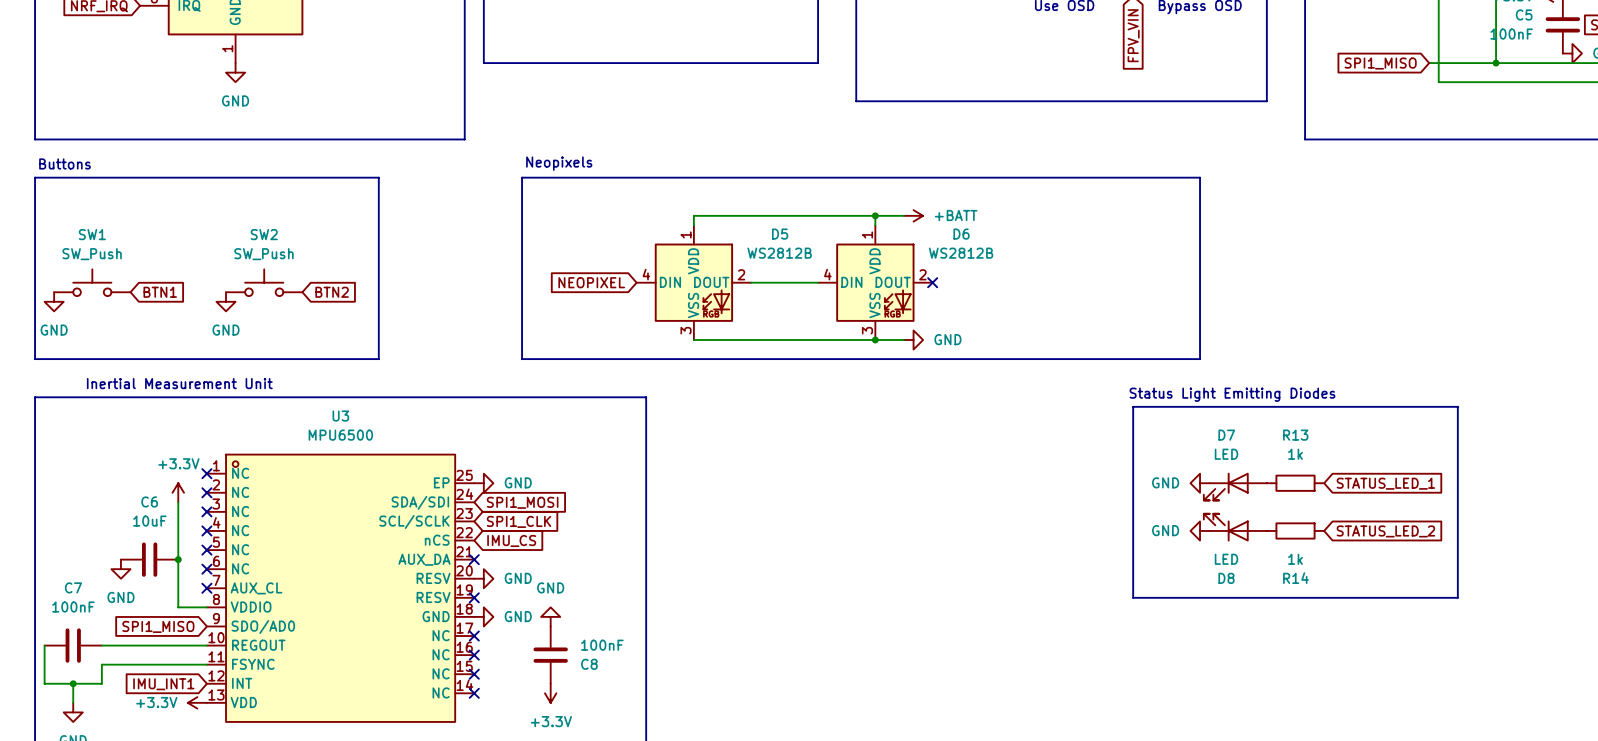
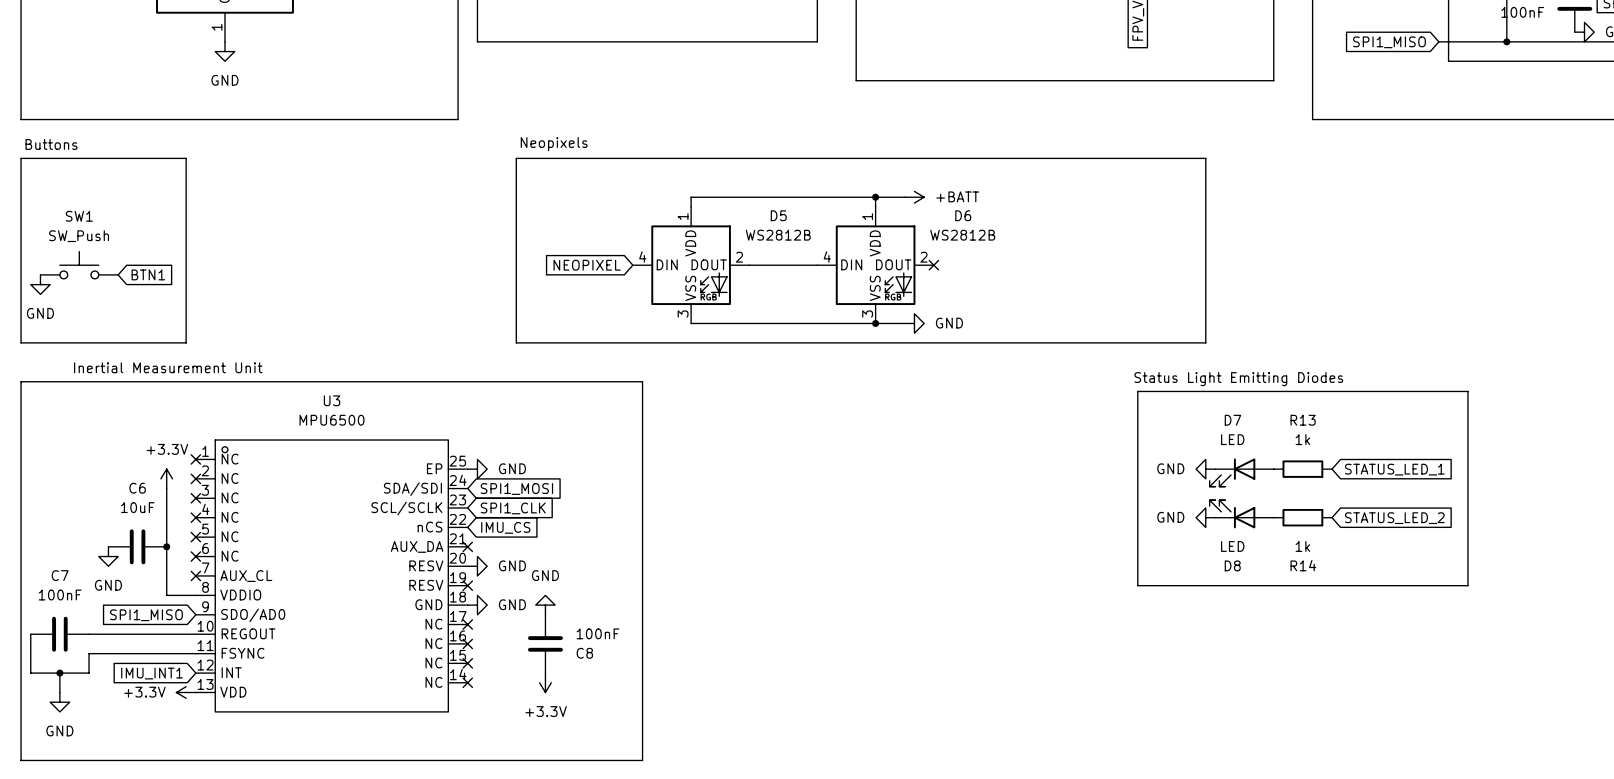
line: (197, 177) (378, 177) (378, 359) (197, 359) -> (186, 158) (186, 342)
SW2: SW_Push (264, 282) -> none
global label: BTN2 (332, 292) -> none
power symbol: GND (226, 301) -> none

